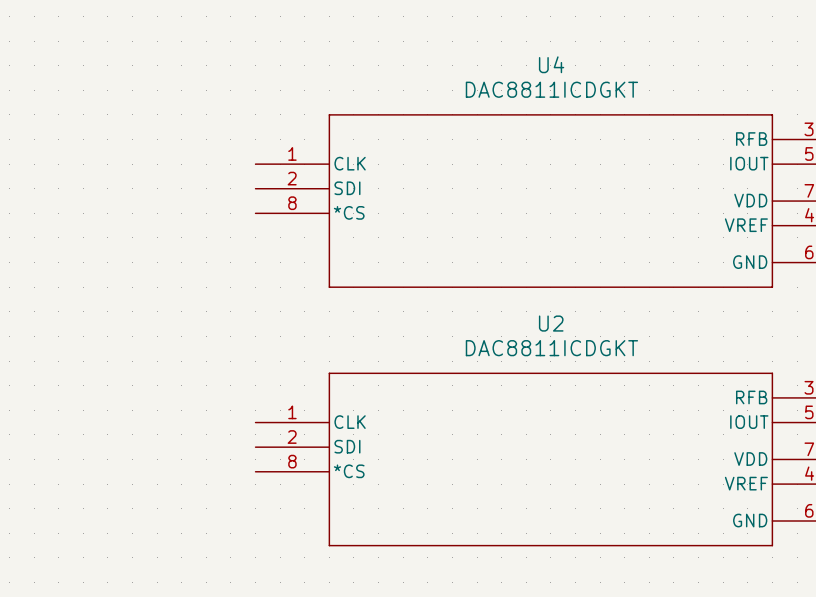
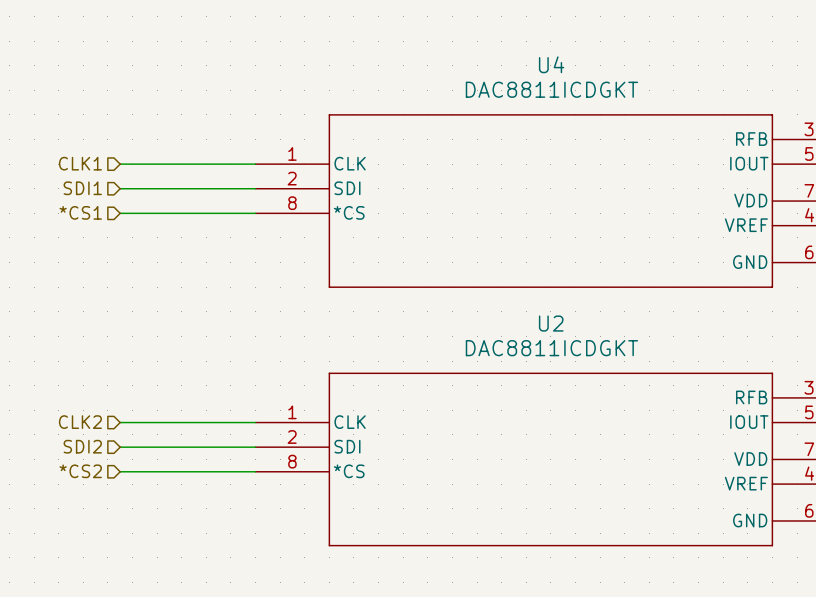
hierarchical label: none -> CLK1 (80, 163)
wire: none -> (120, 164) (255, 164)
hierarchical label: none -> SDI1 (82, 188)
wire: none -> (120, 188) (255, 188)
hierarchical label: none -> *CS1 (80, 212)
wire: none -> (120, 213) (255, 213)
hierarchical label: none -> CLK2 (80, 422)
wire: none -> (120, 422) (255, 422)
hierarchical label: none -> SDI2 (82, 446)
wire: none -> (120, 447) (255, 447)
hierarchical label: none -> *CS2 (80, 471)
wire: none -> (120, 471) (255, 471)

